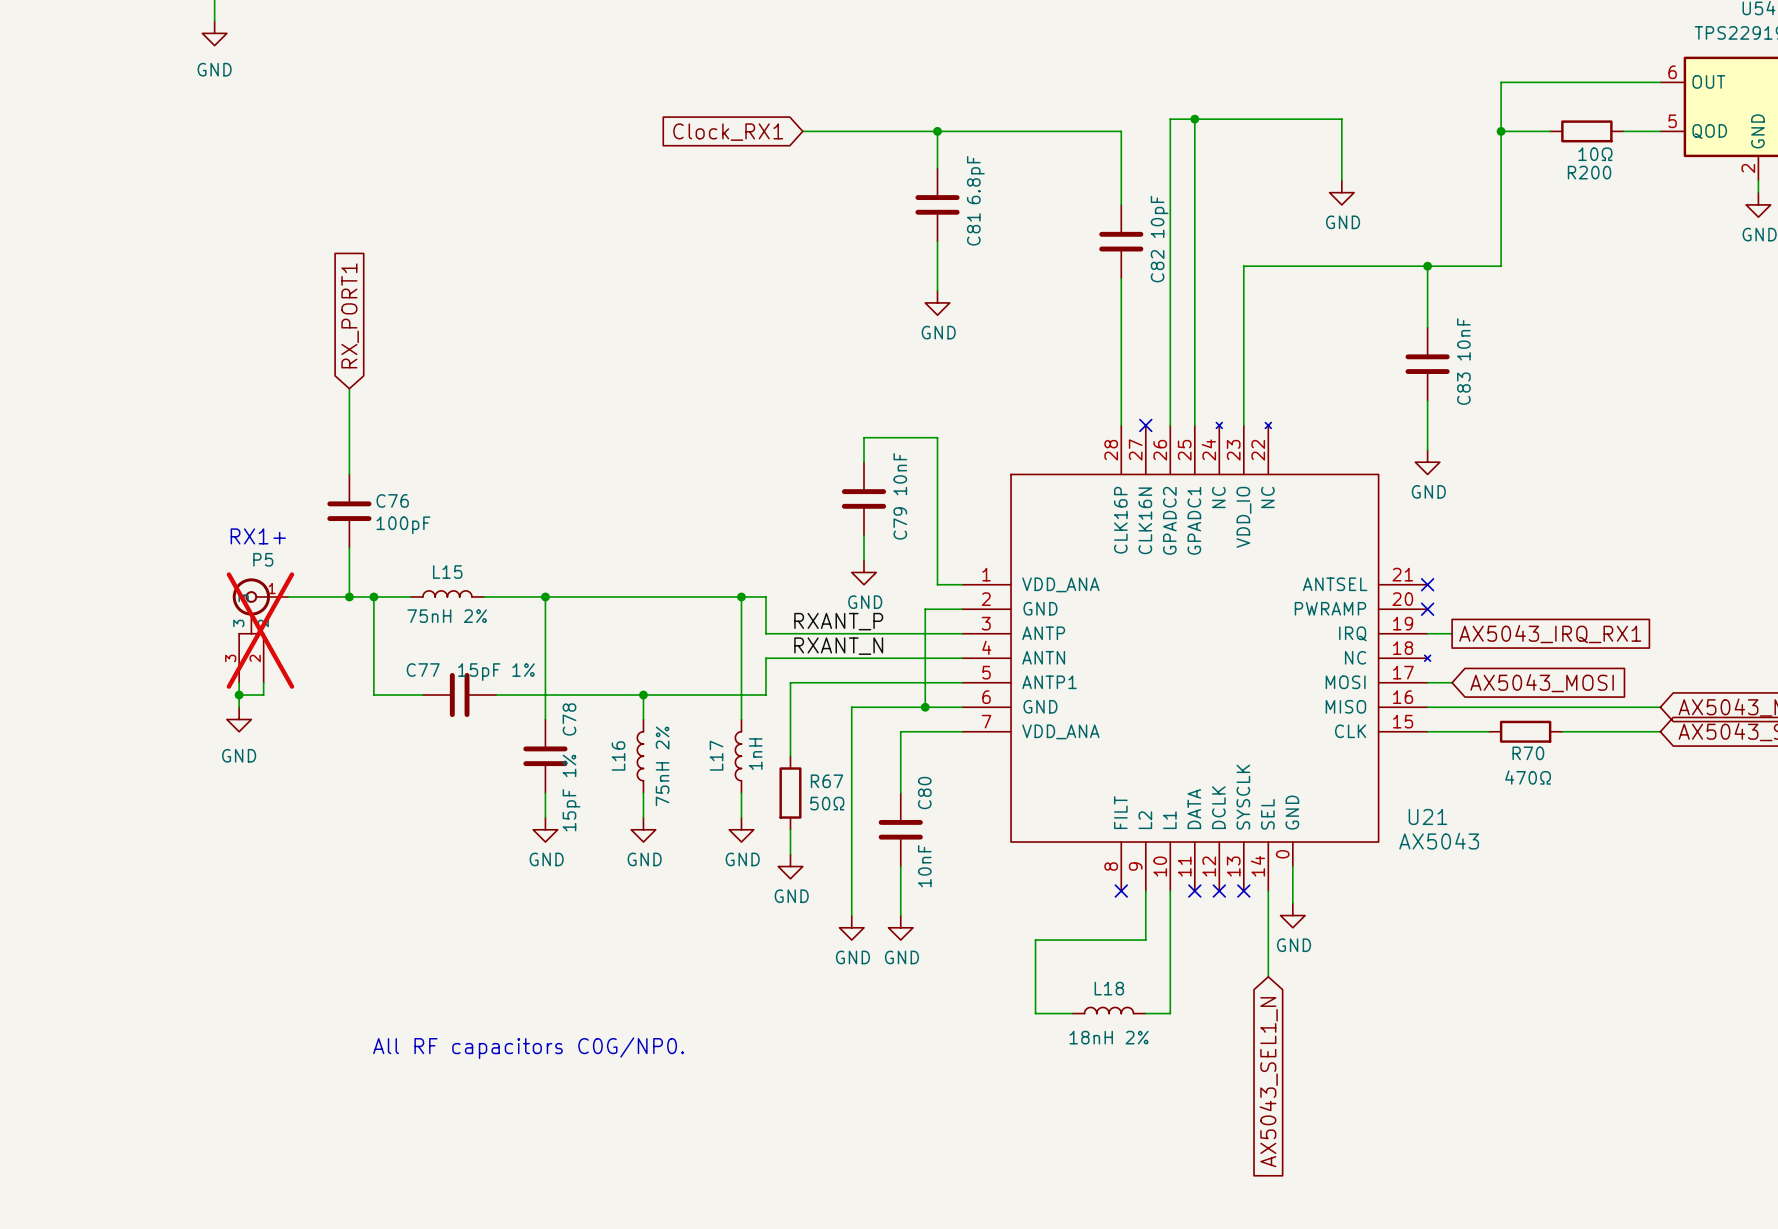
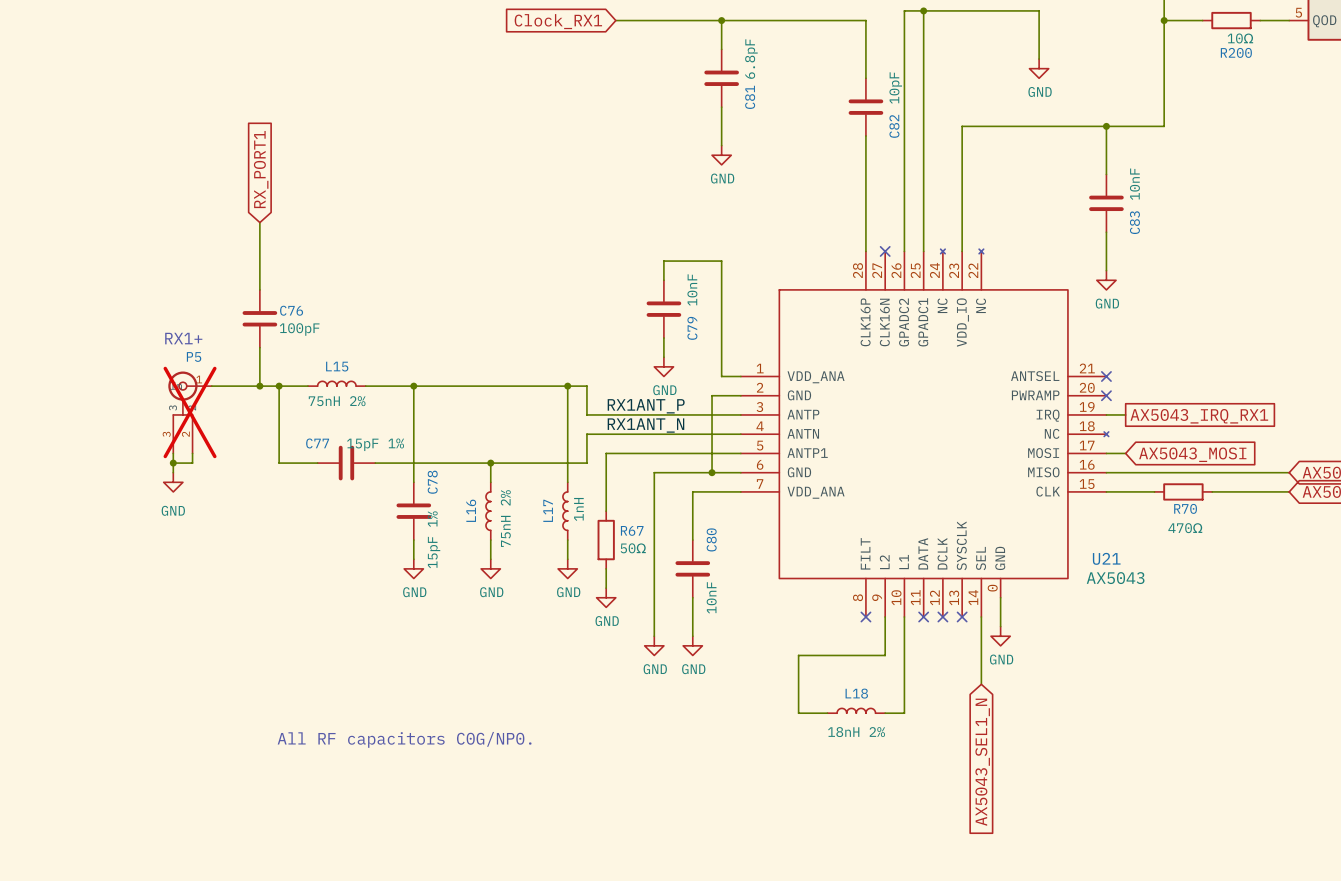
label: RXANT_P (838, 621) -> RX1ANT_P (646, 406)
label: RXANT_N (838, 646) -> RX1ANT_N (645, 425)

